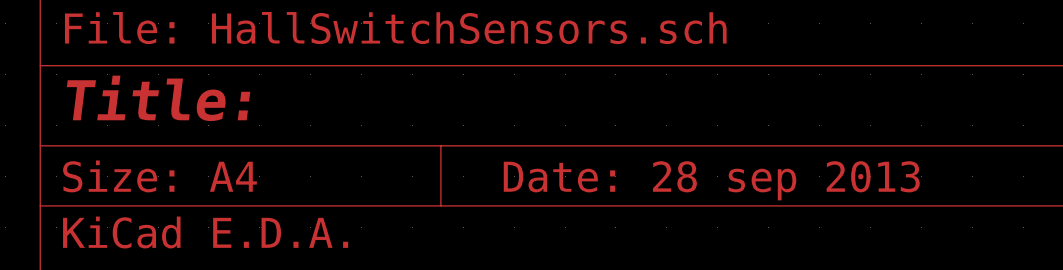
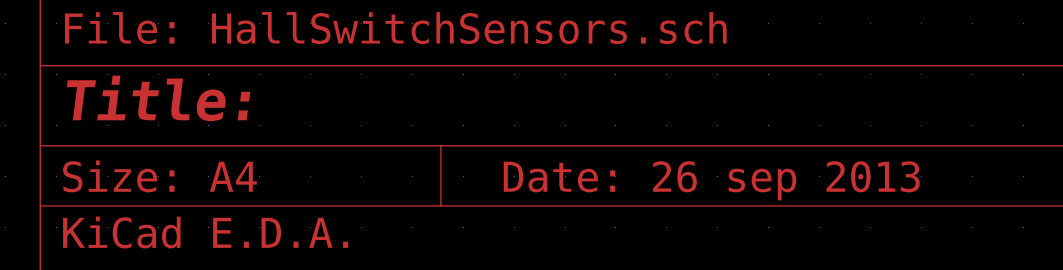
title block: Date: 28 sep 2013 (711, 180) -> Date: 26 sep 2013 (711, 180)

